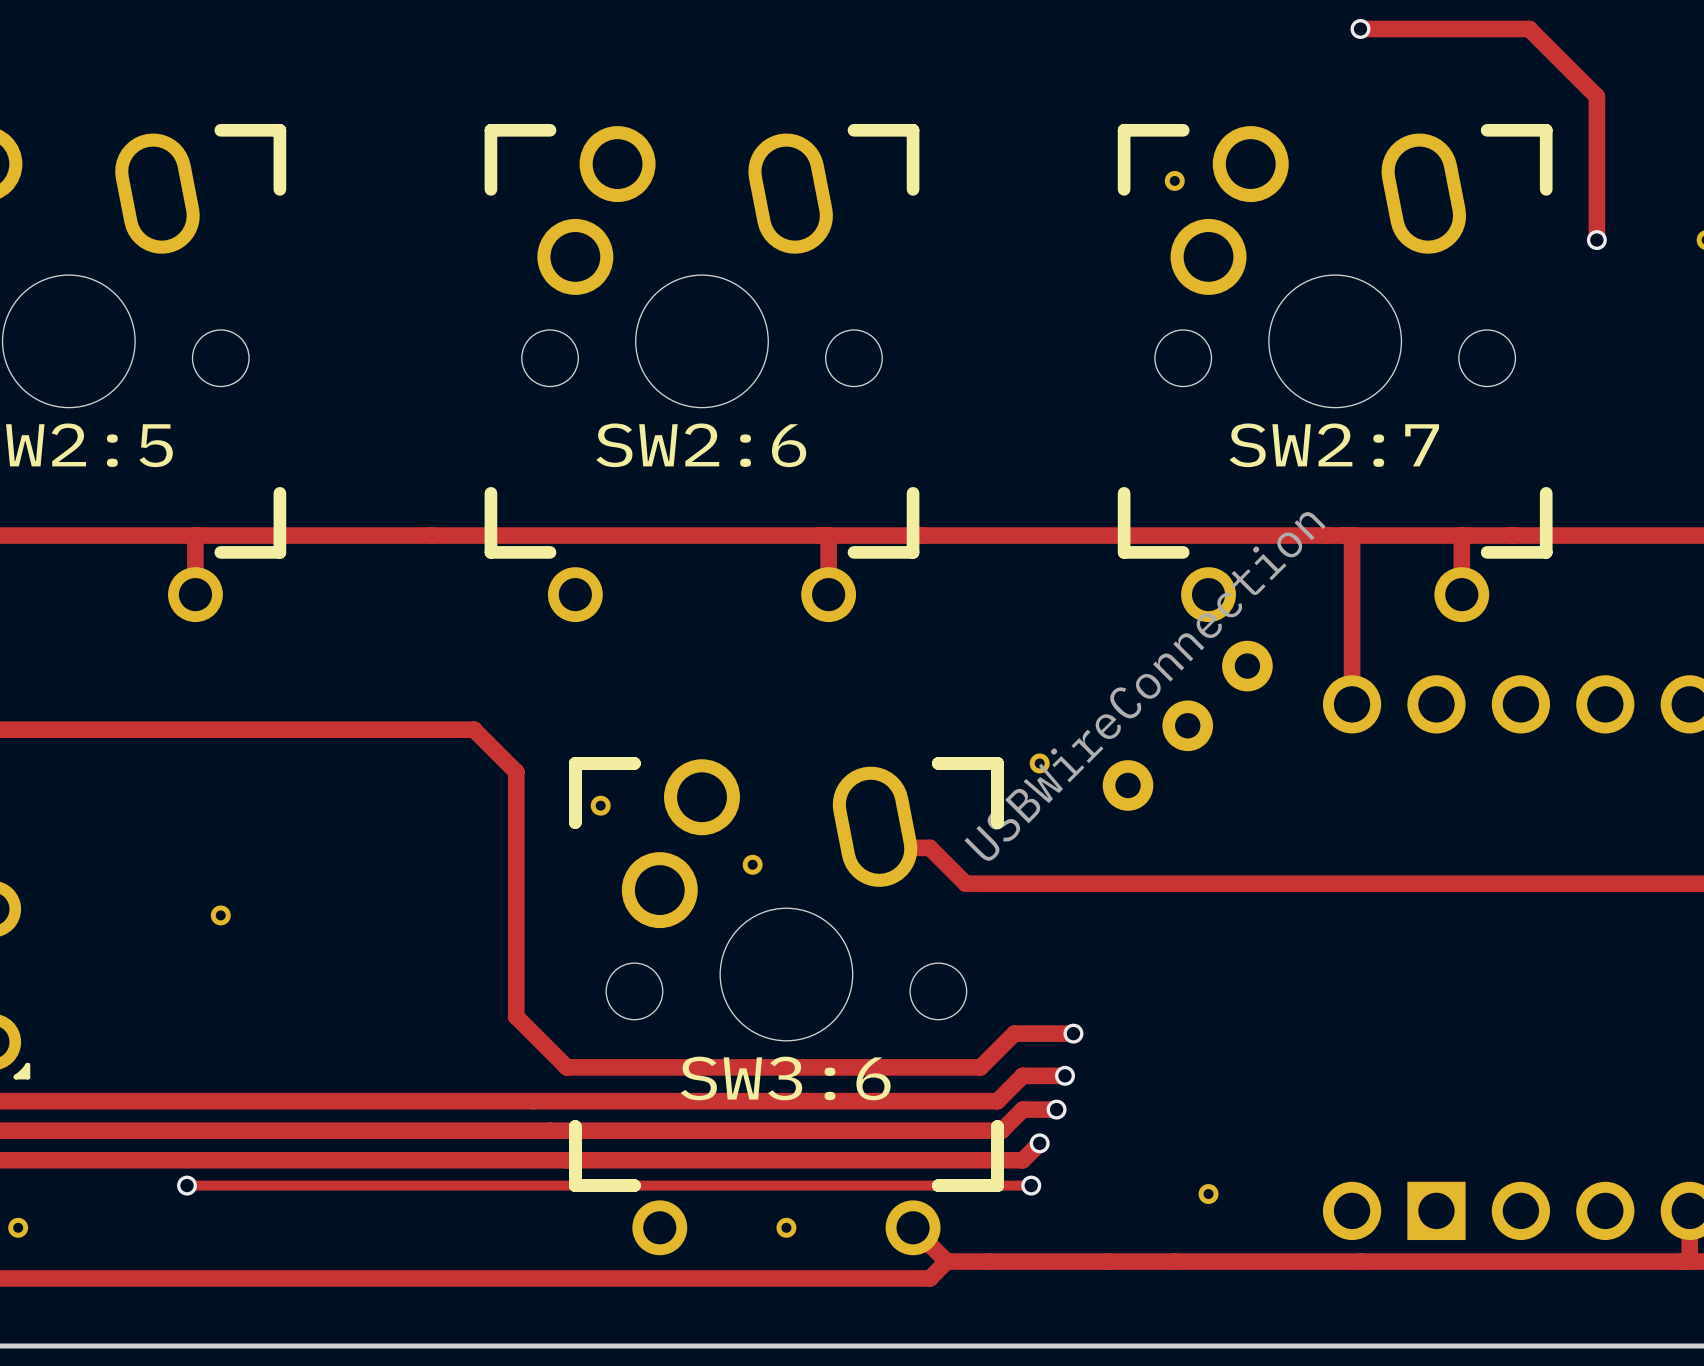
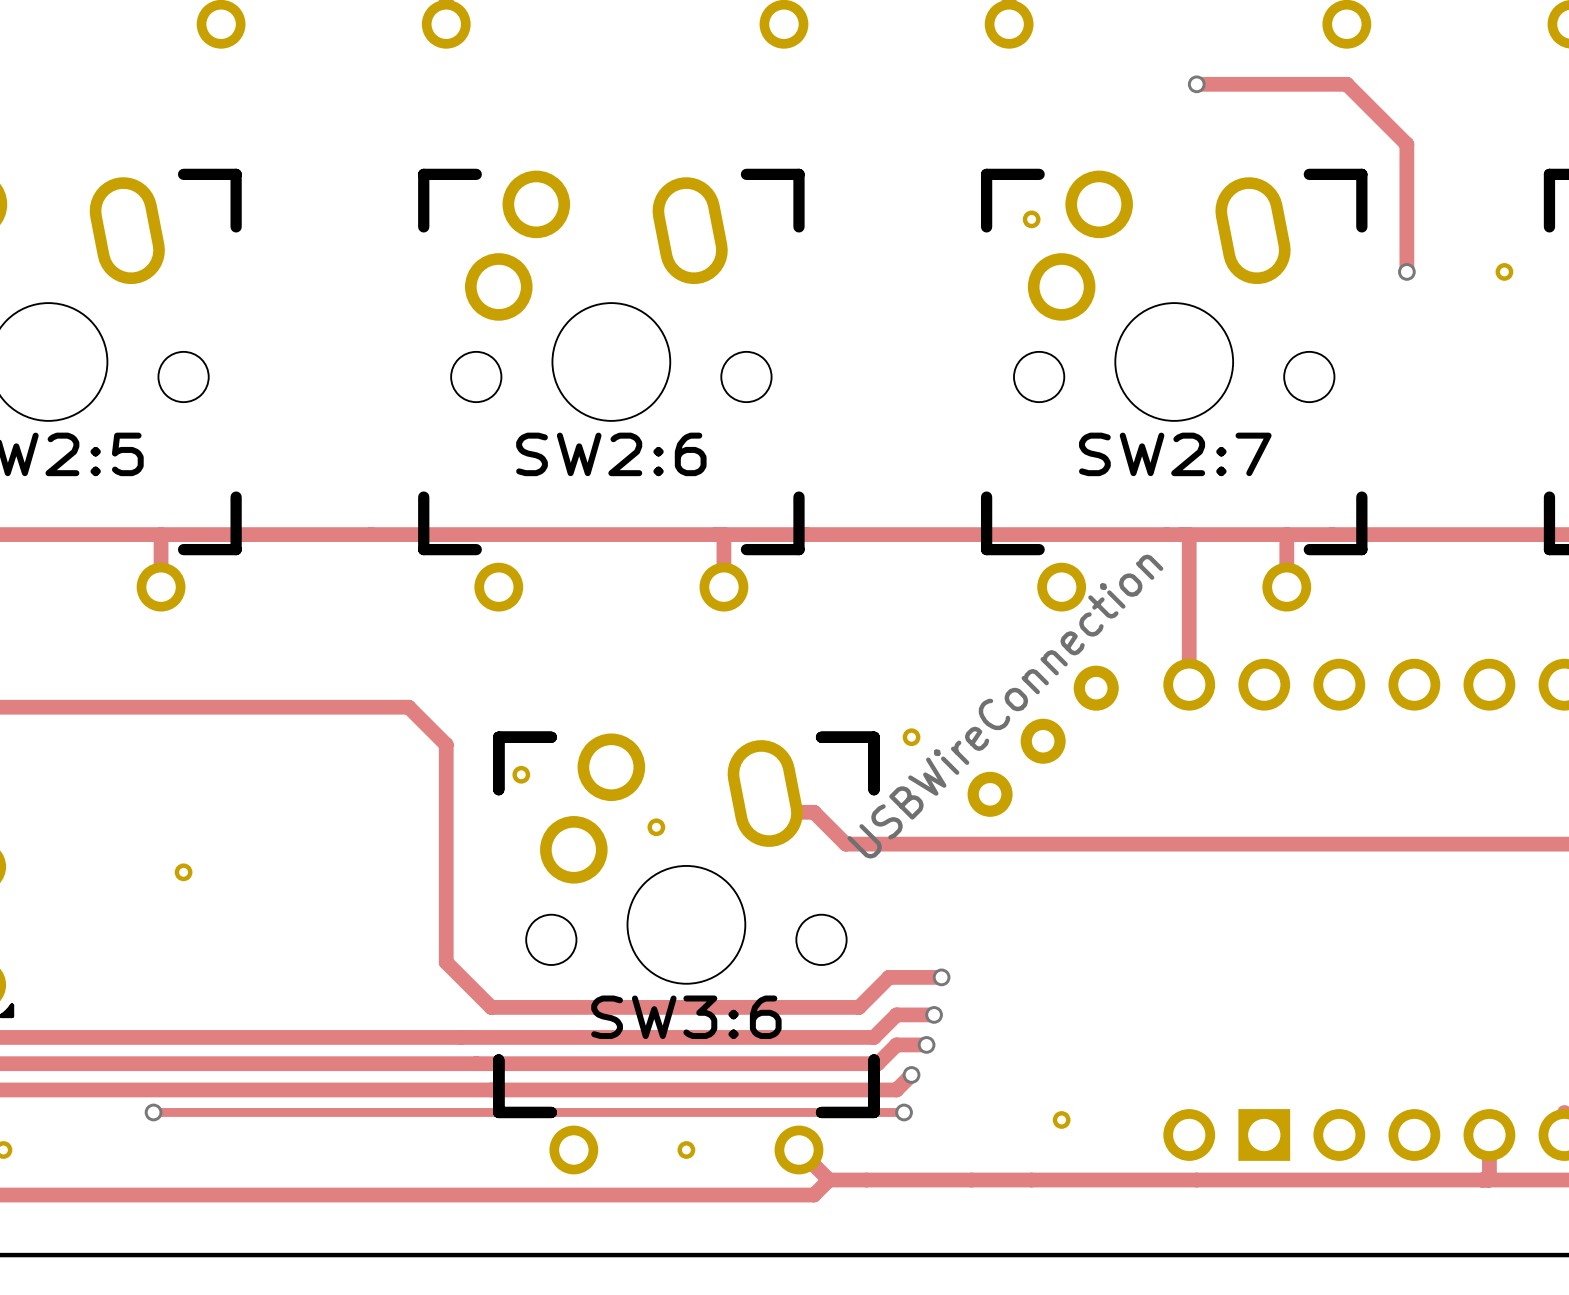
part position: (1187, 725) -> (1043, 741)

